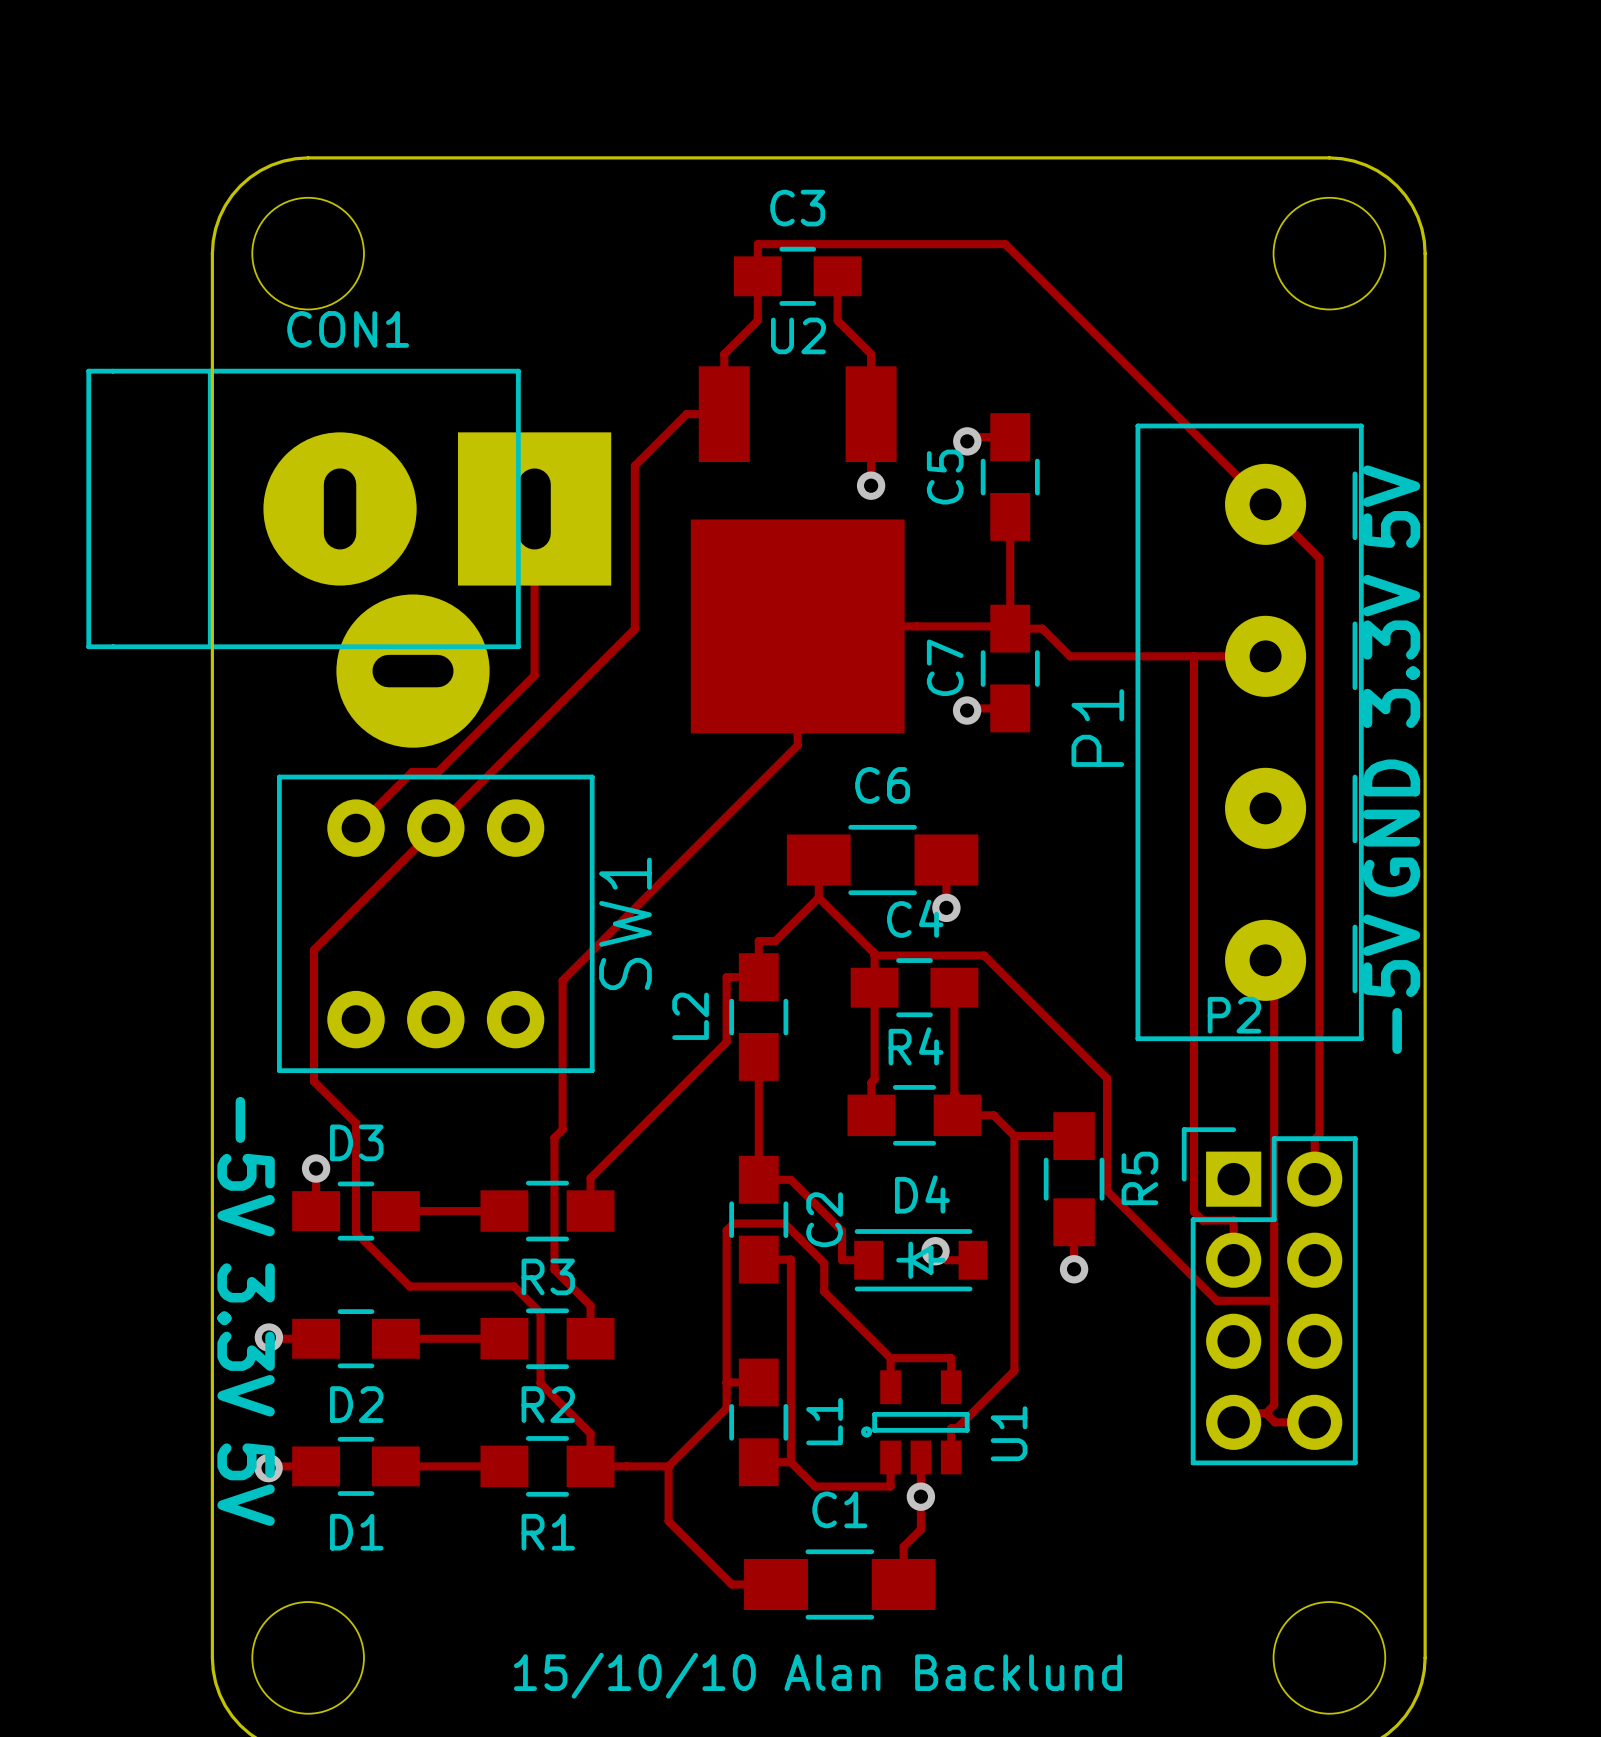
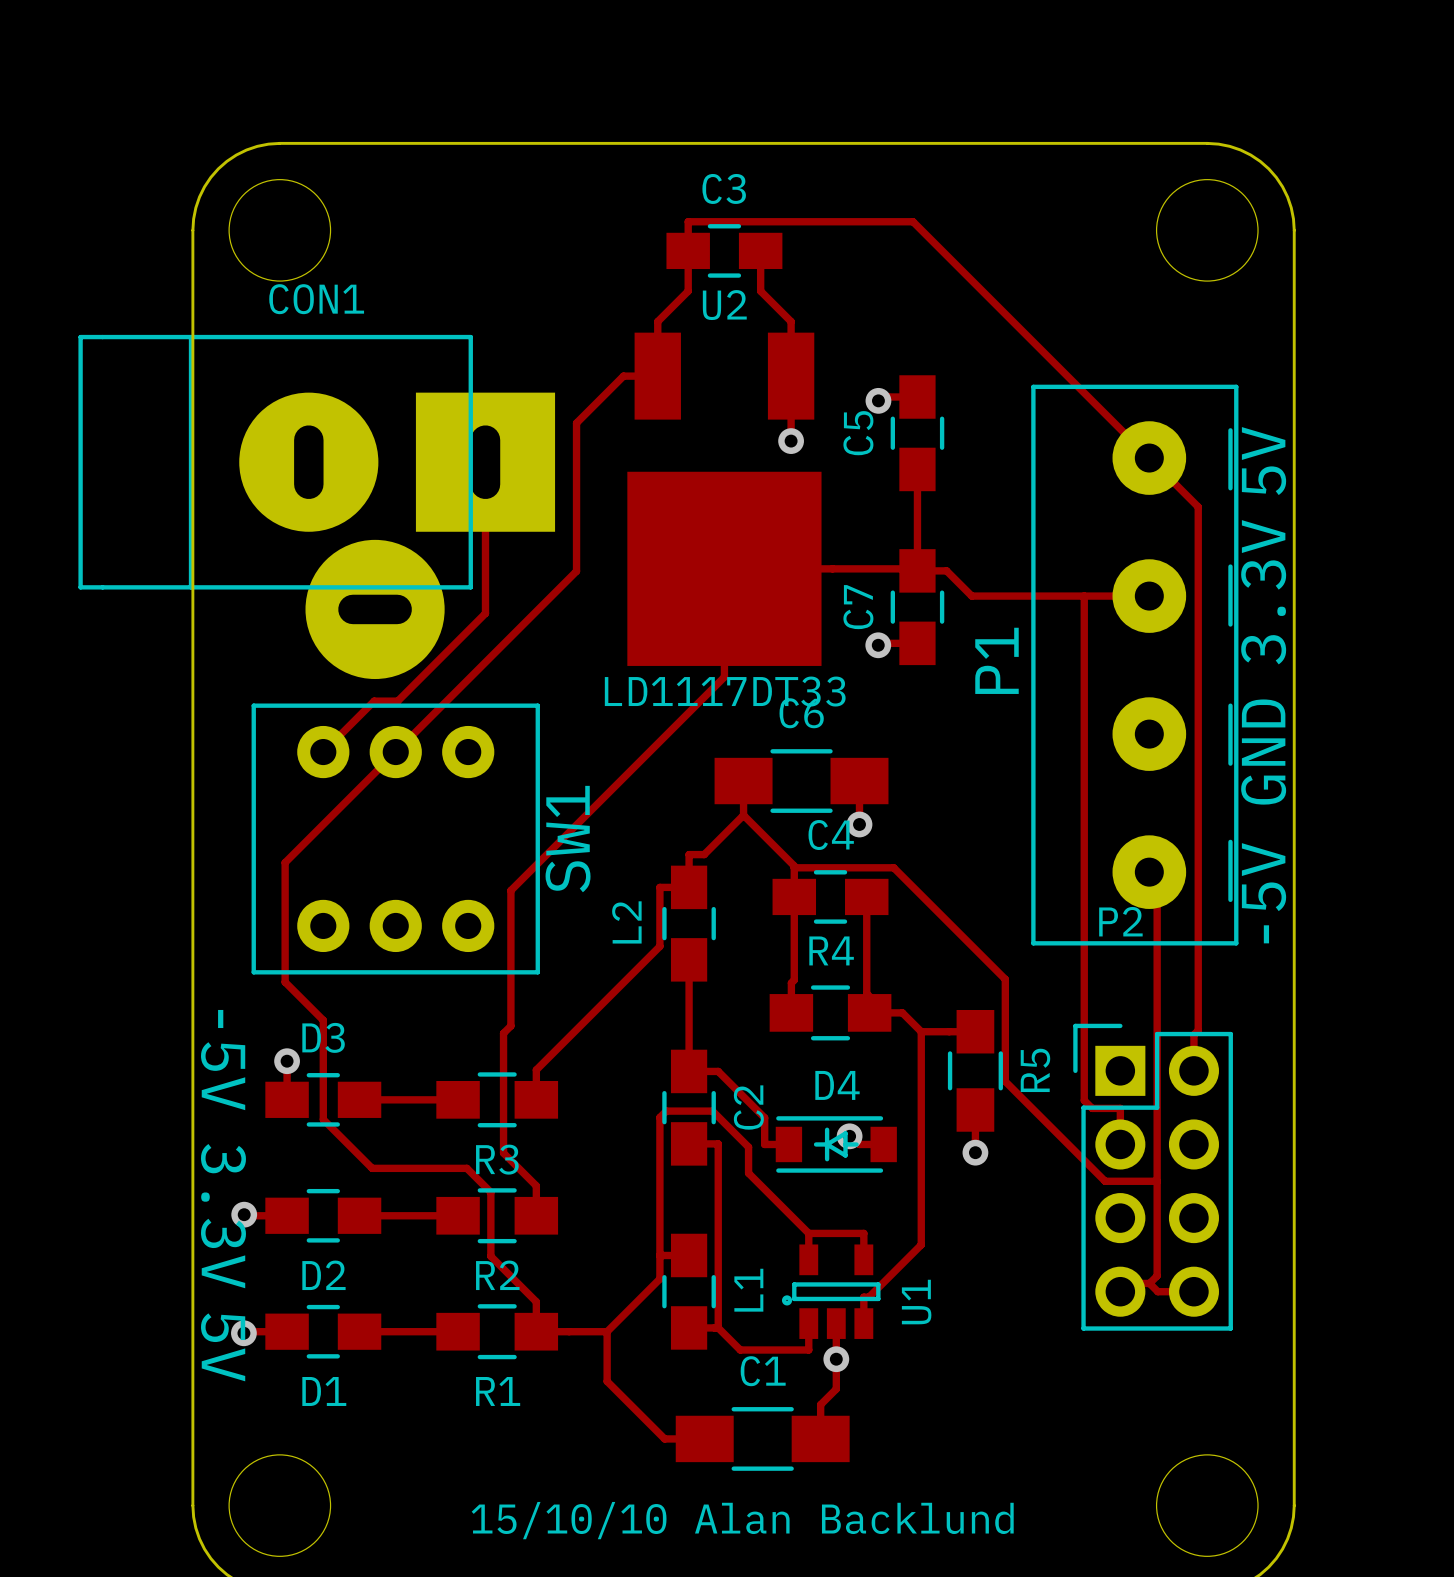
U2 value: none -> LD1117DT33 (725, 691)

